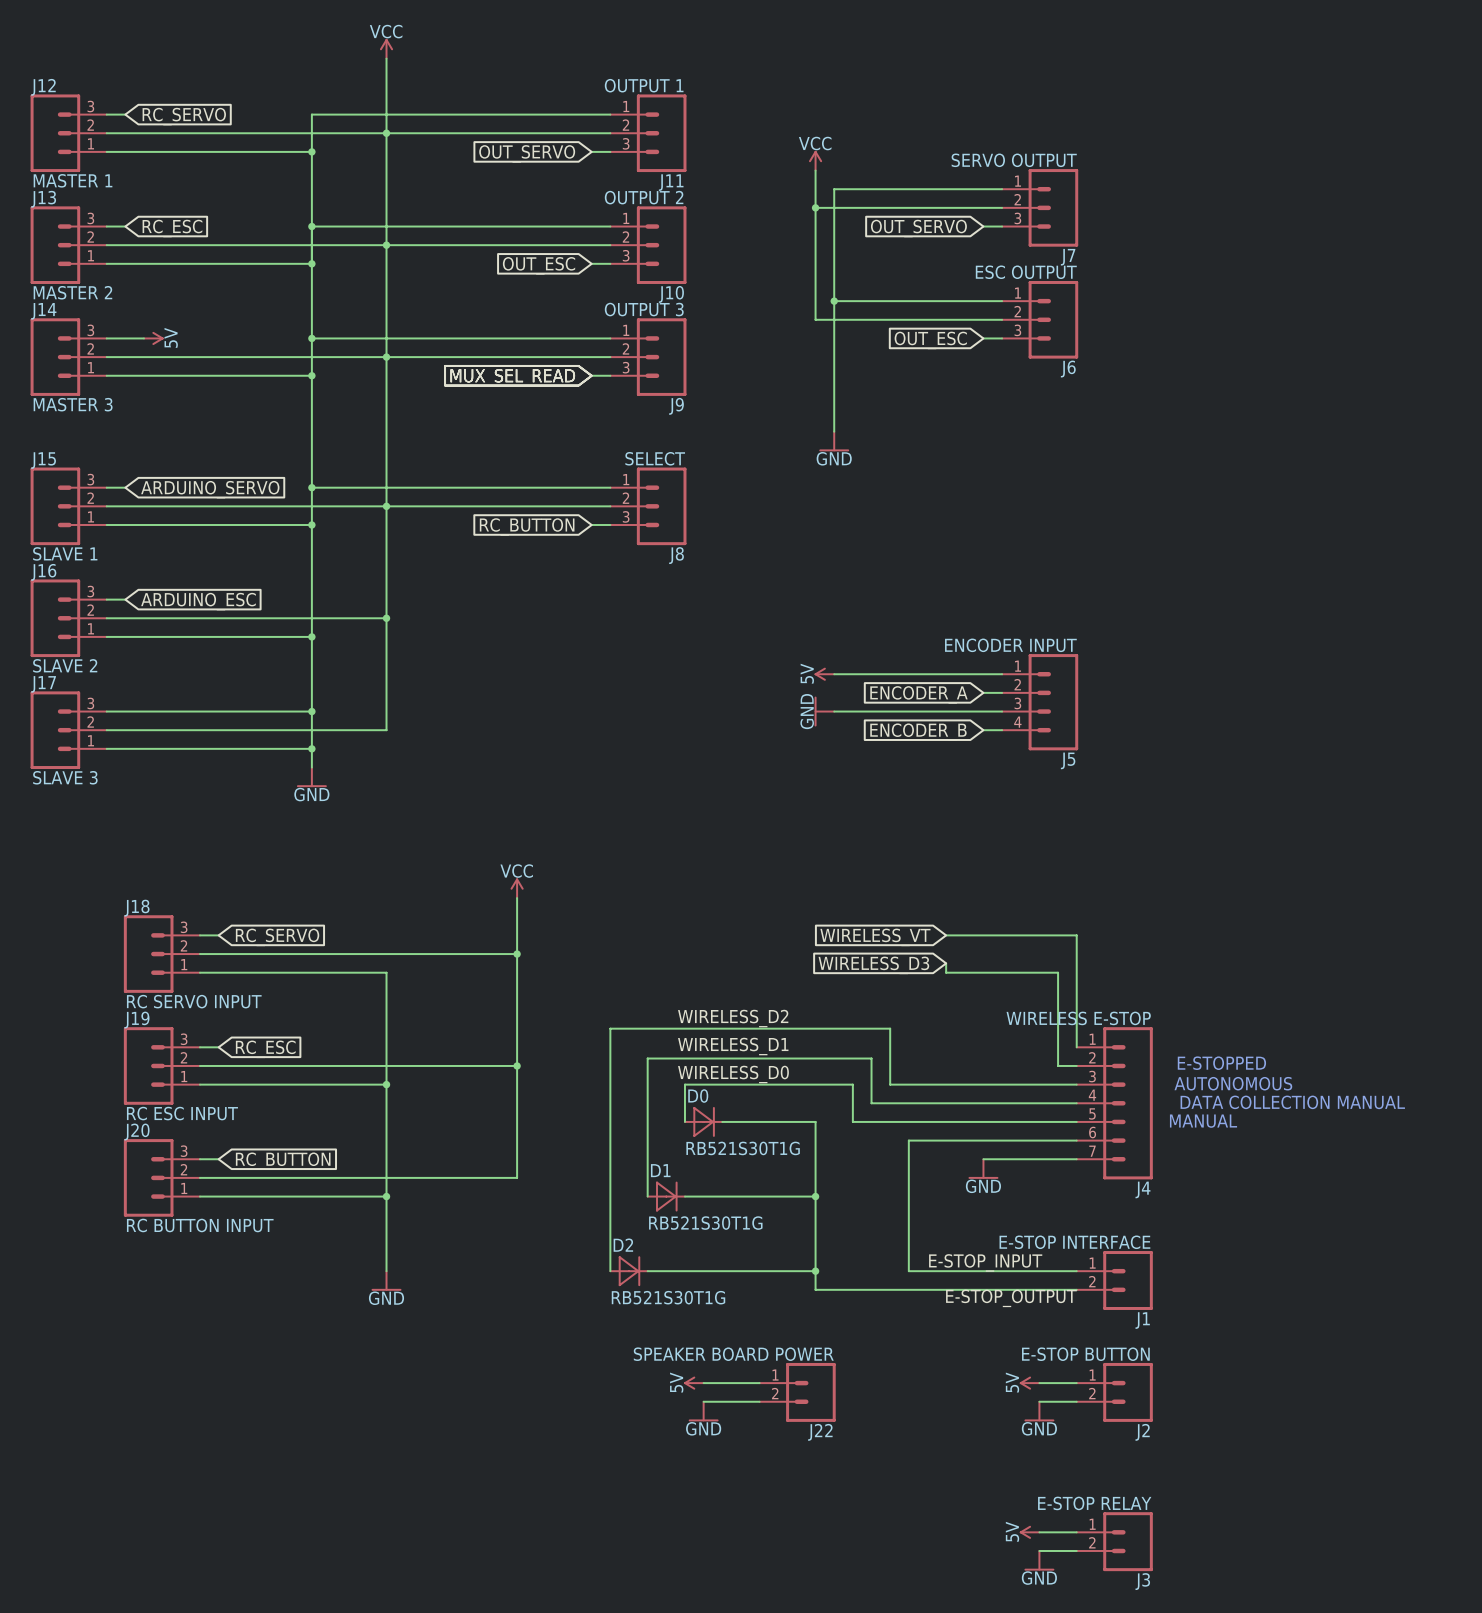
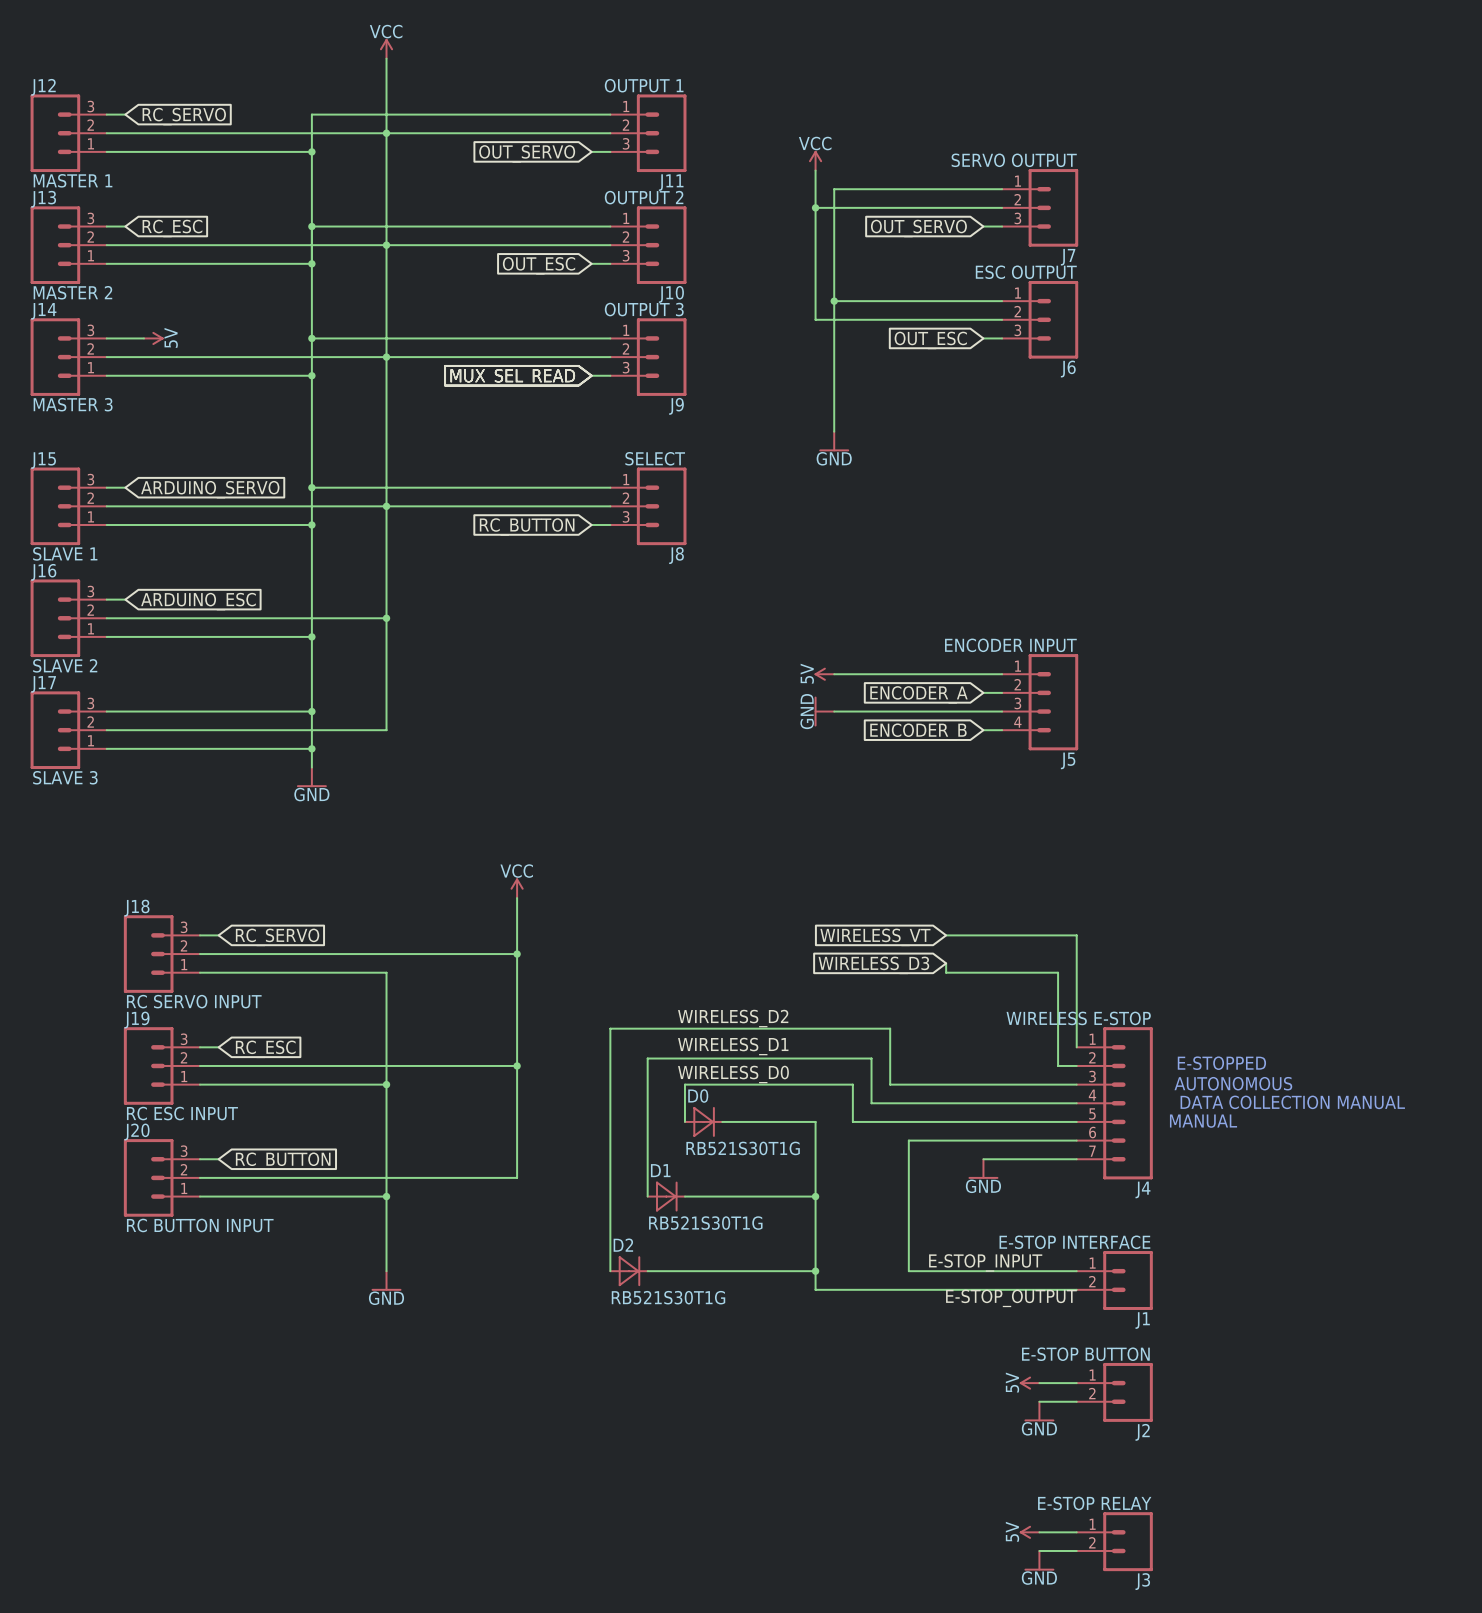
power symbol: 5V (693, 1383) -> none
wire: (703, 1383) (759, 1383) -> none
J22: SPEAKER BOARD POWER (797, 1392) -> none
wire: (703, 1401) (759, 1401) -> none
power symbol: GND (703, 1411) -> none

